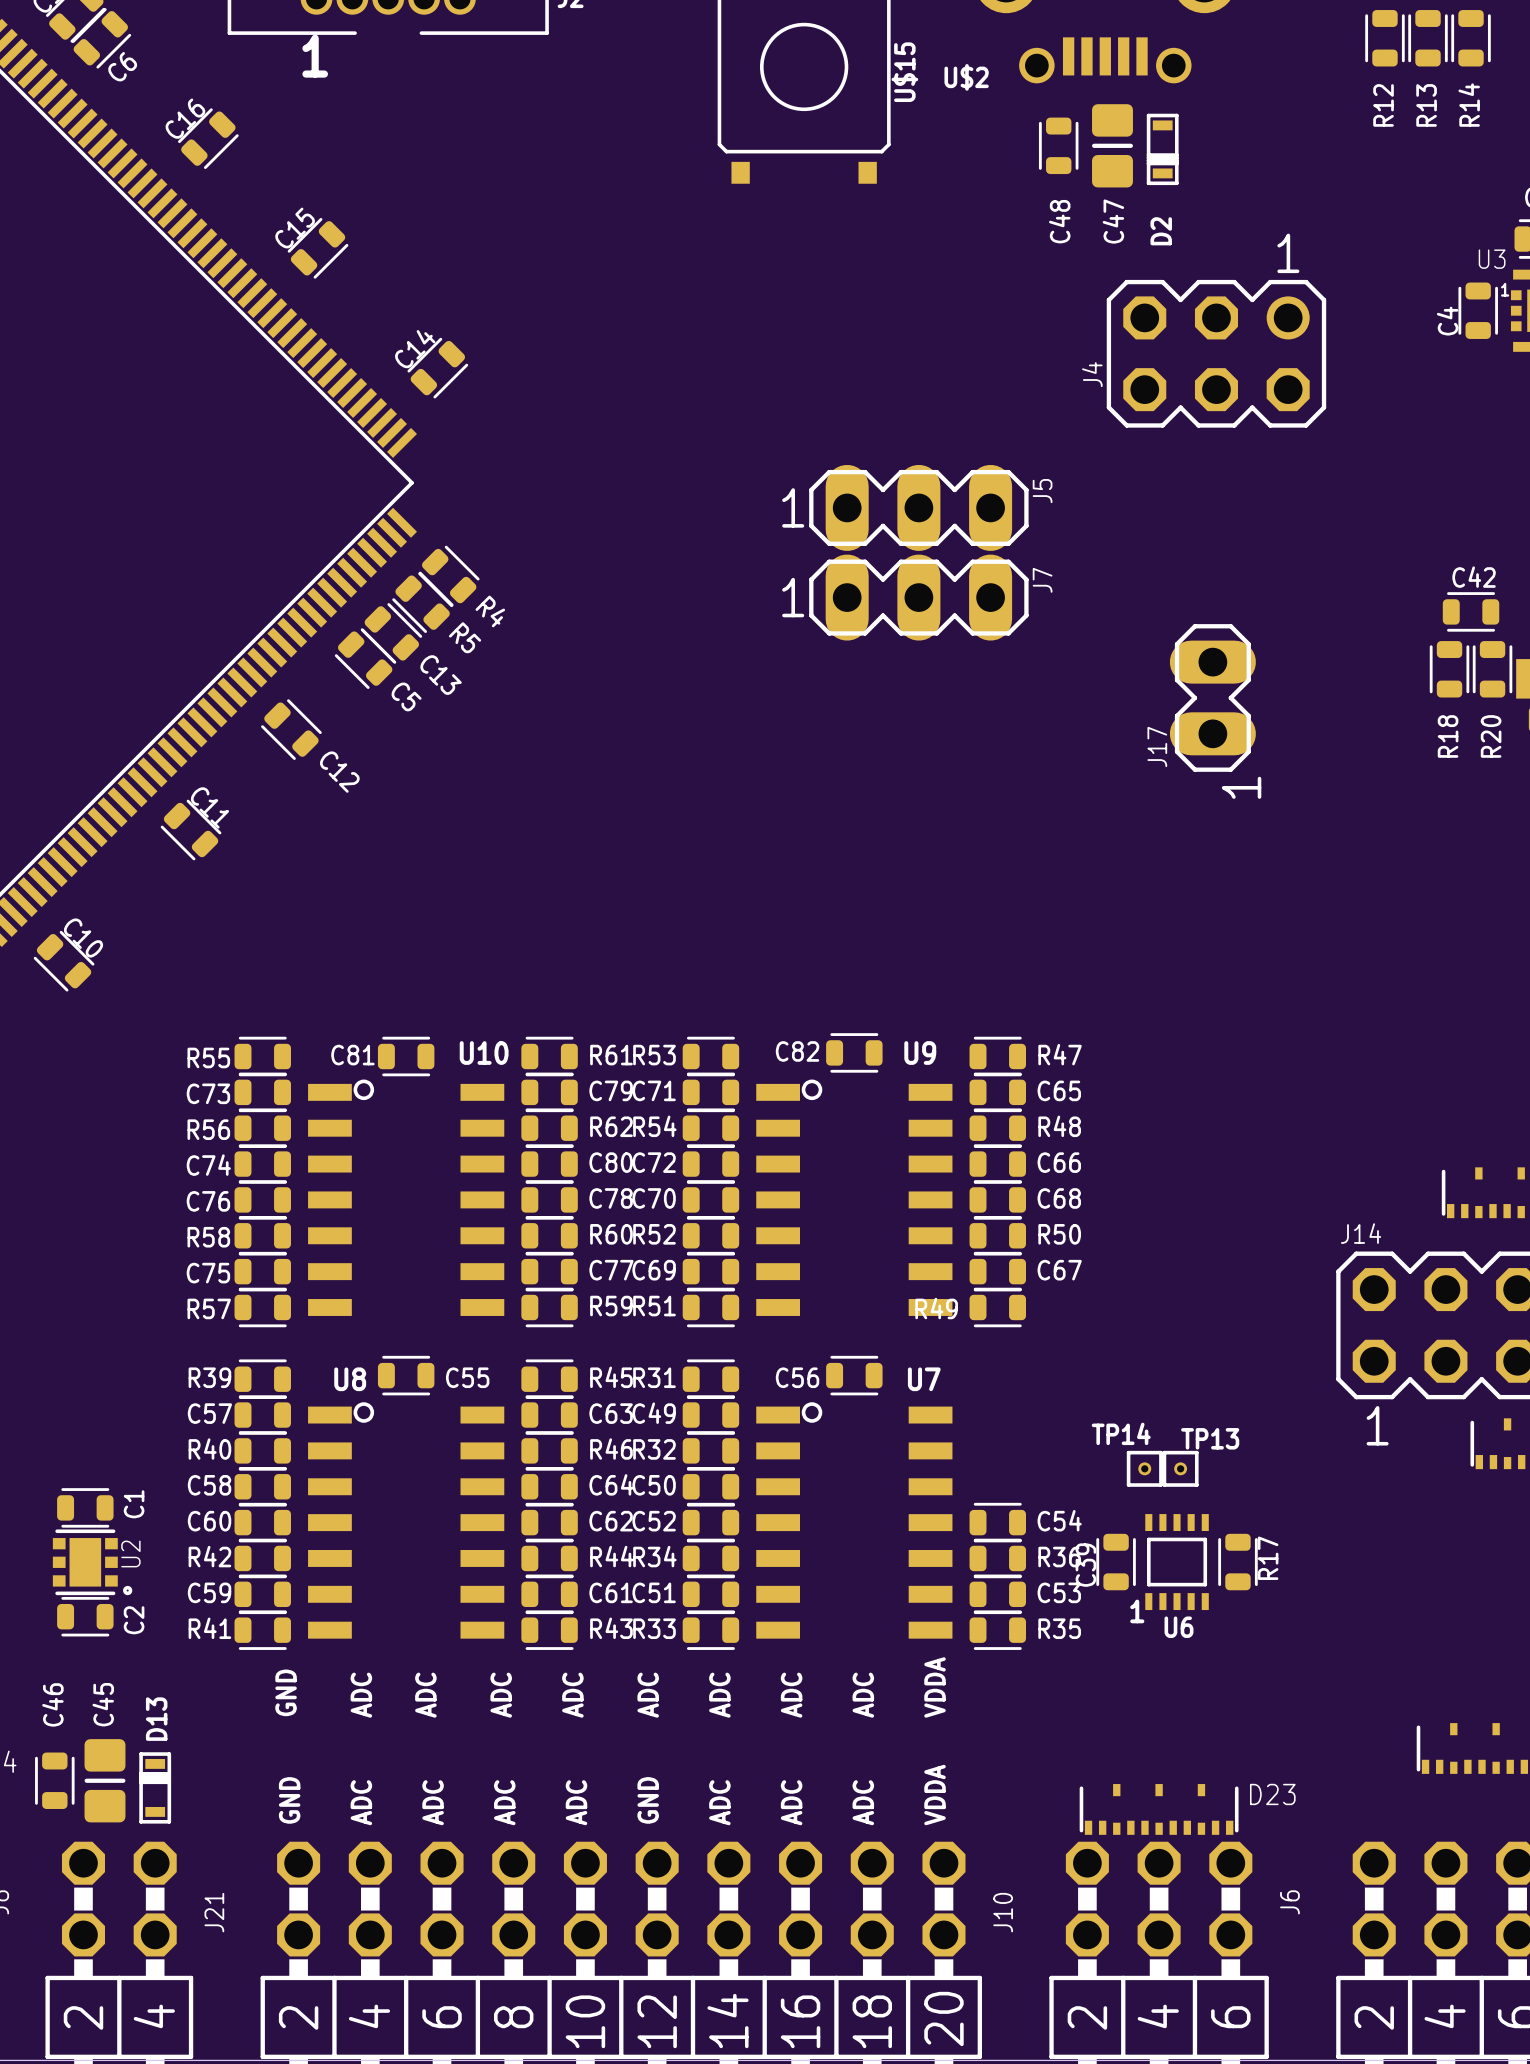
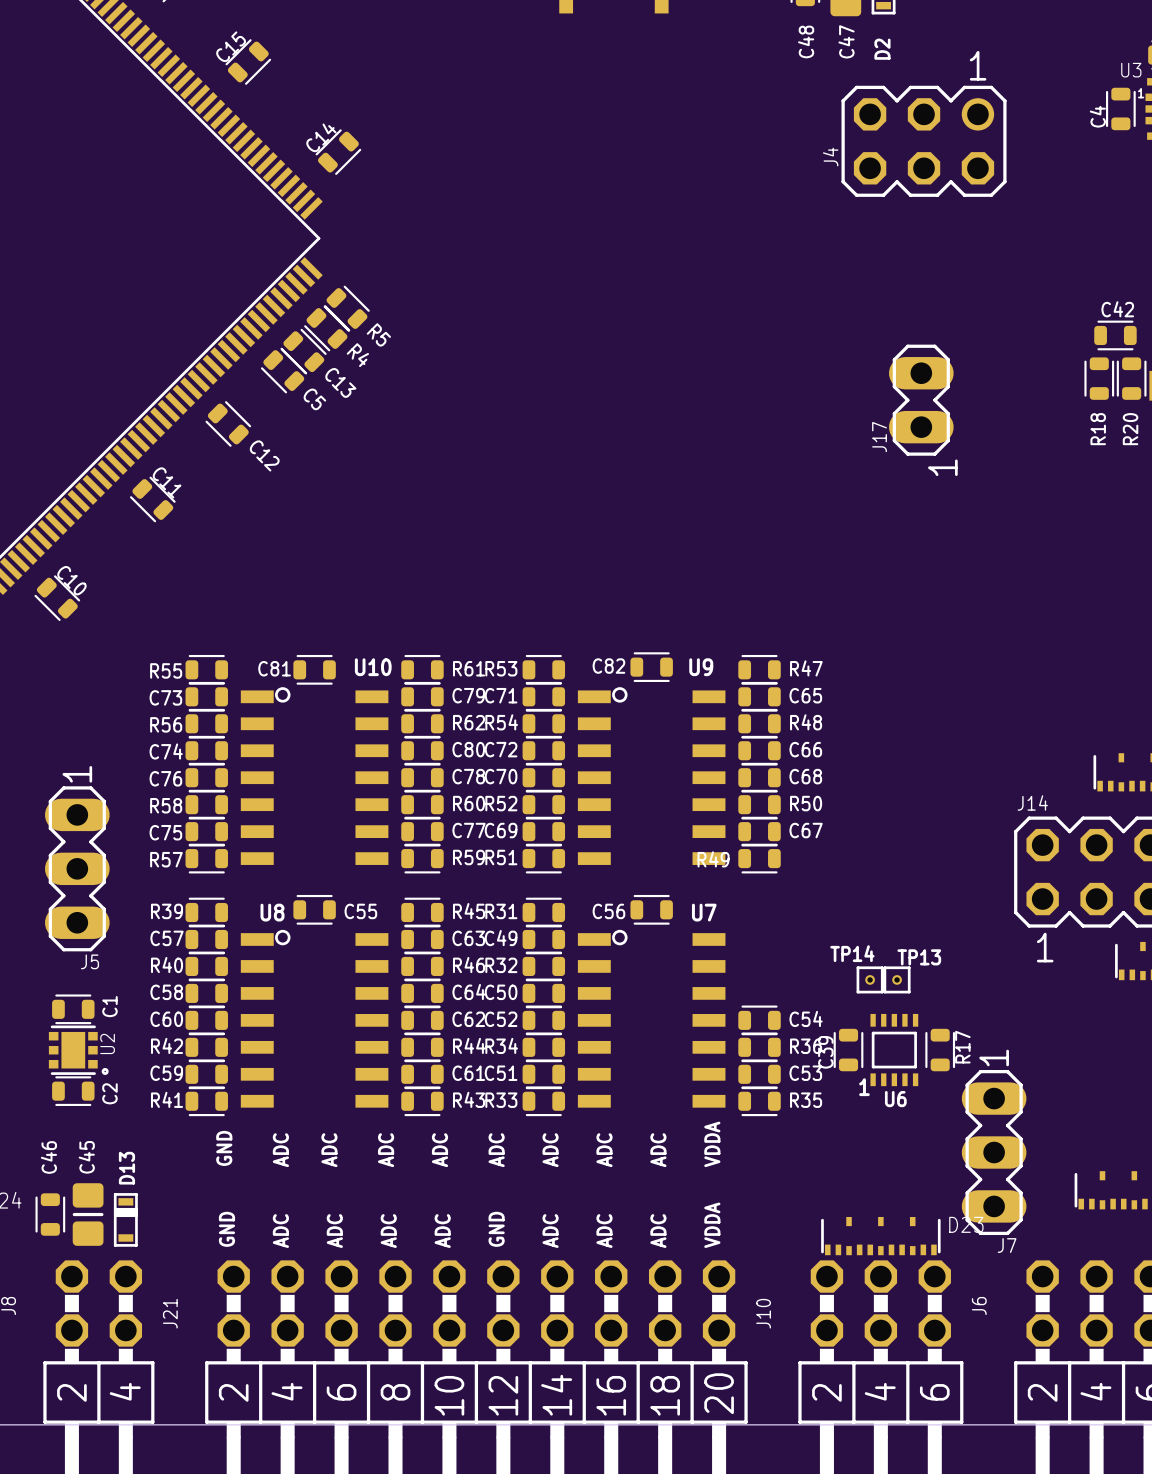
J5 footprint: [809, 464, 1029, 551] -> [44, 786, 110, 952]
J5 name position: J5 (1042, 491) -> J5 (90, 961)
J7 footprint: [809, 554, 1029, 641] -> [961, 1069, 1027, 1236]
J7 name position: J7 (1042, 580) -> J7 (1007, 1245)
R4 name: R4 (490, 611) -> R5 (378, 334)
R5 name: R5 (465, 637) -> R4 (357, 355)

